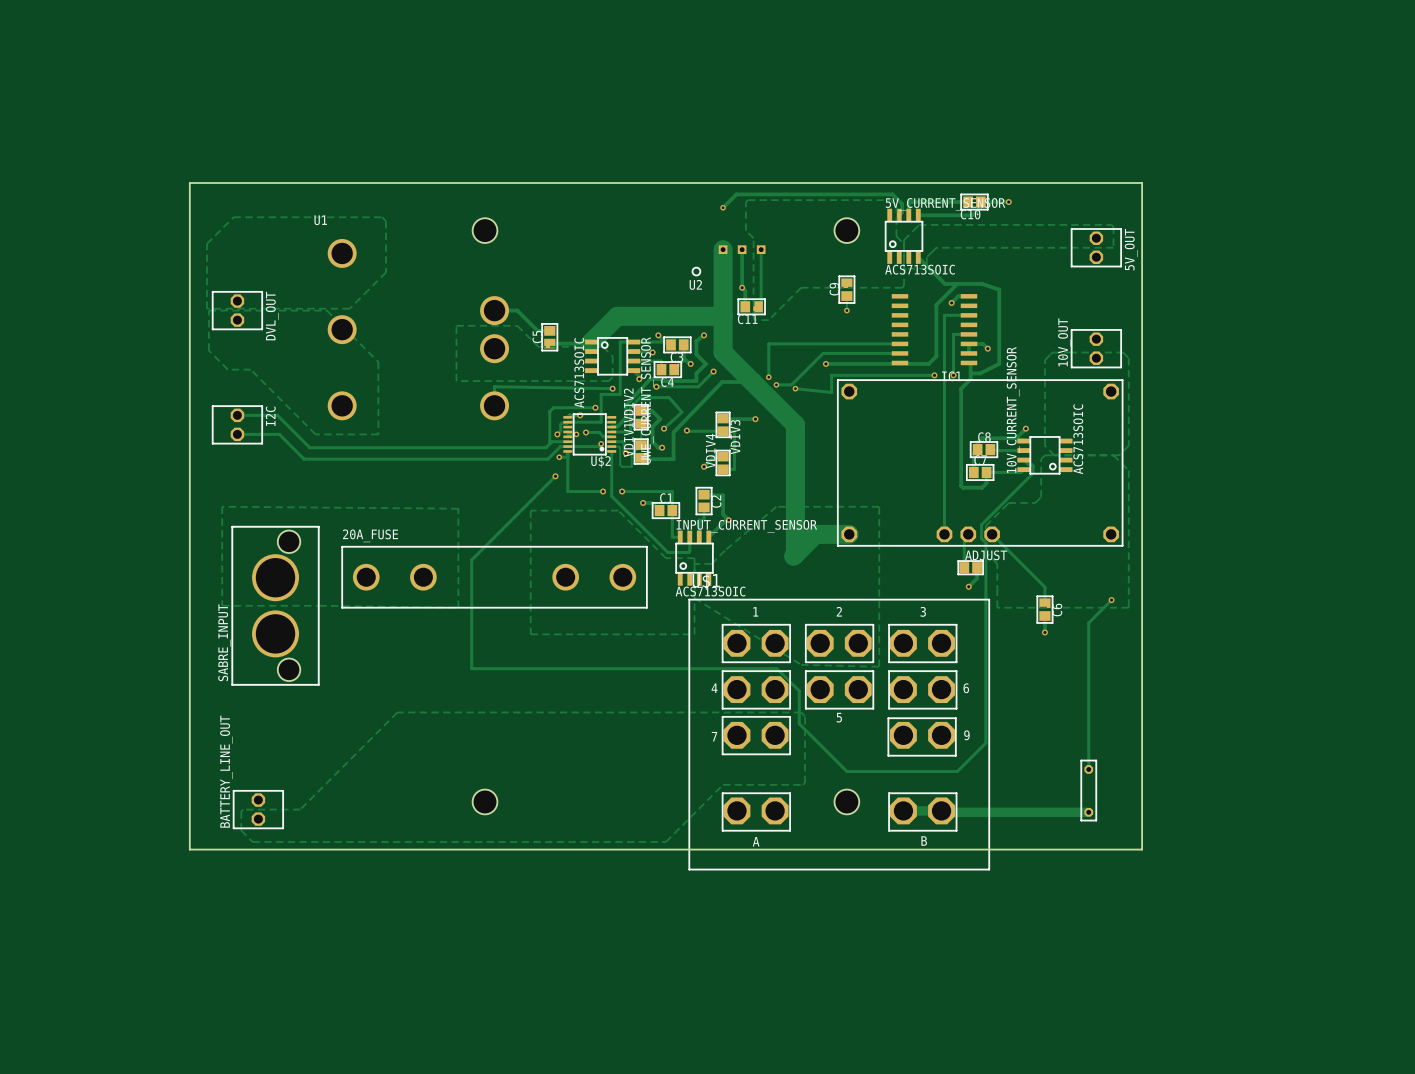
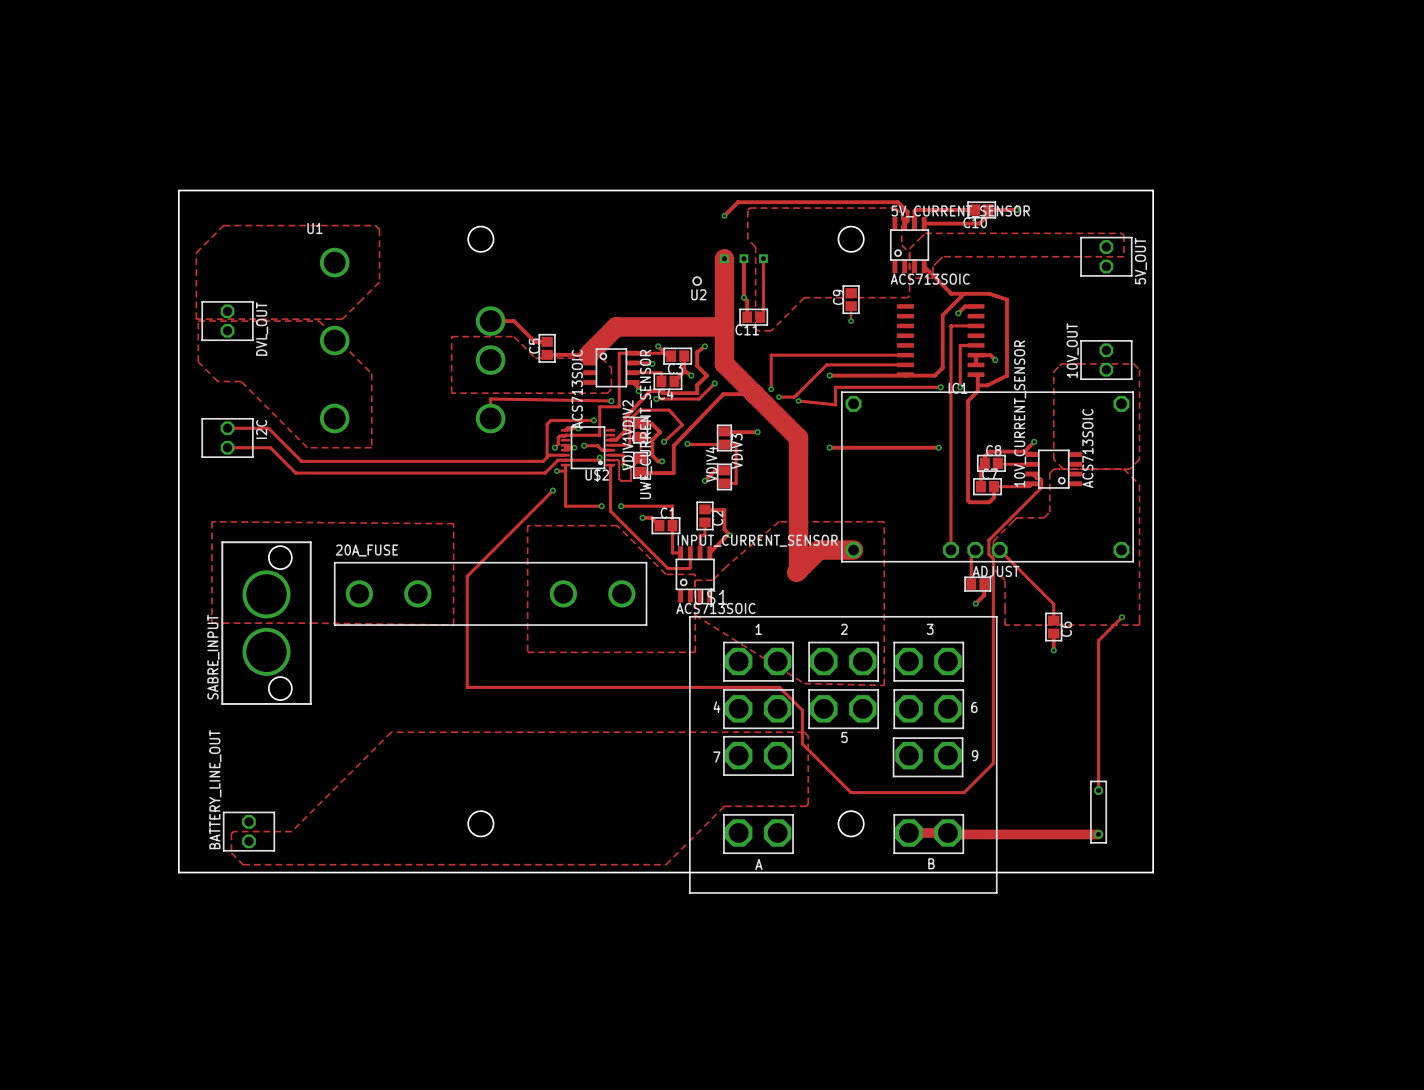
track: none -> (829, 447) (938, 447)
via: none -> (829, 447)
via: none -> (938, 447)

